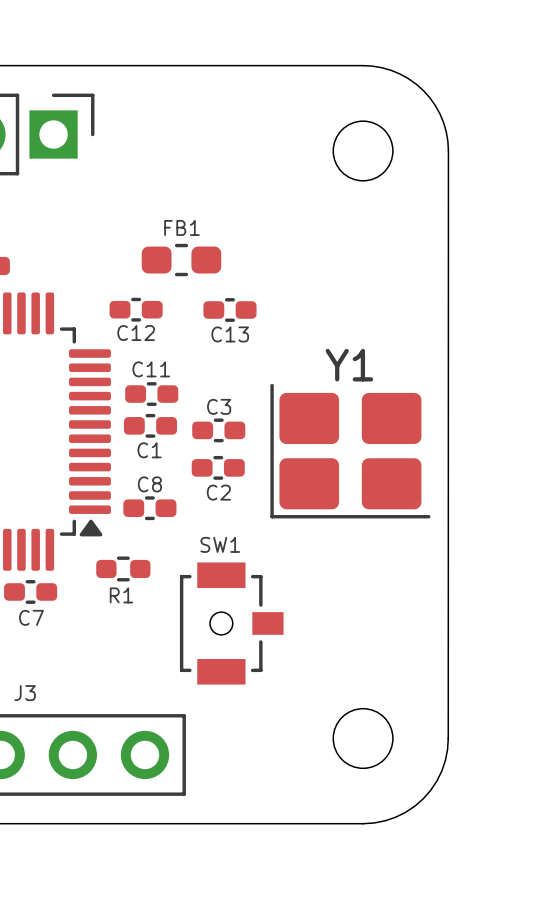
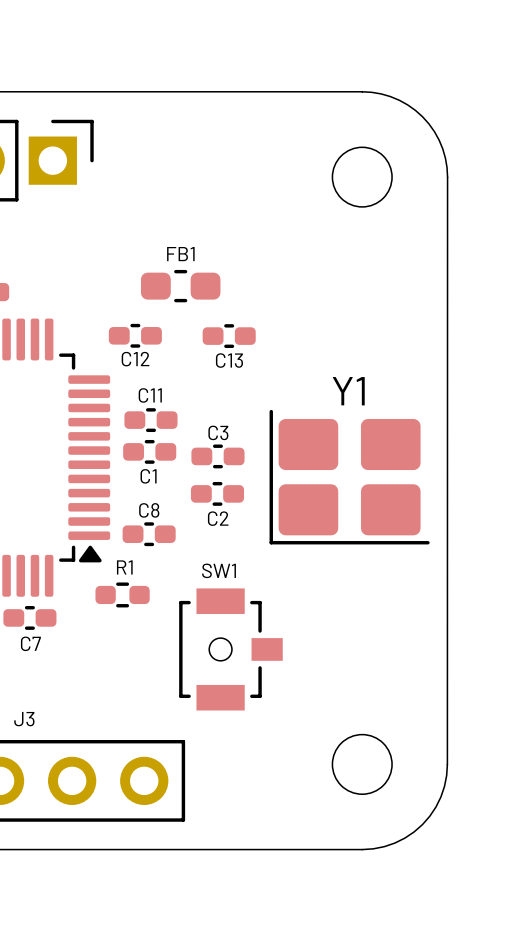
R1 name position: R1 (121, 595) -> R1 (124, 567)

